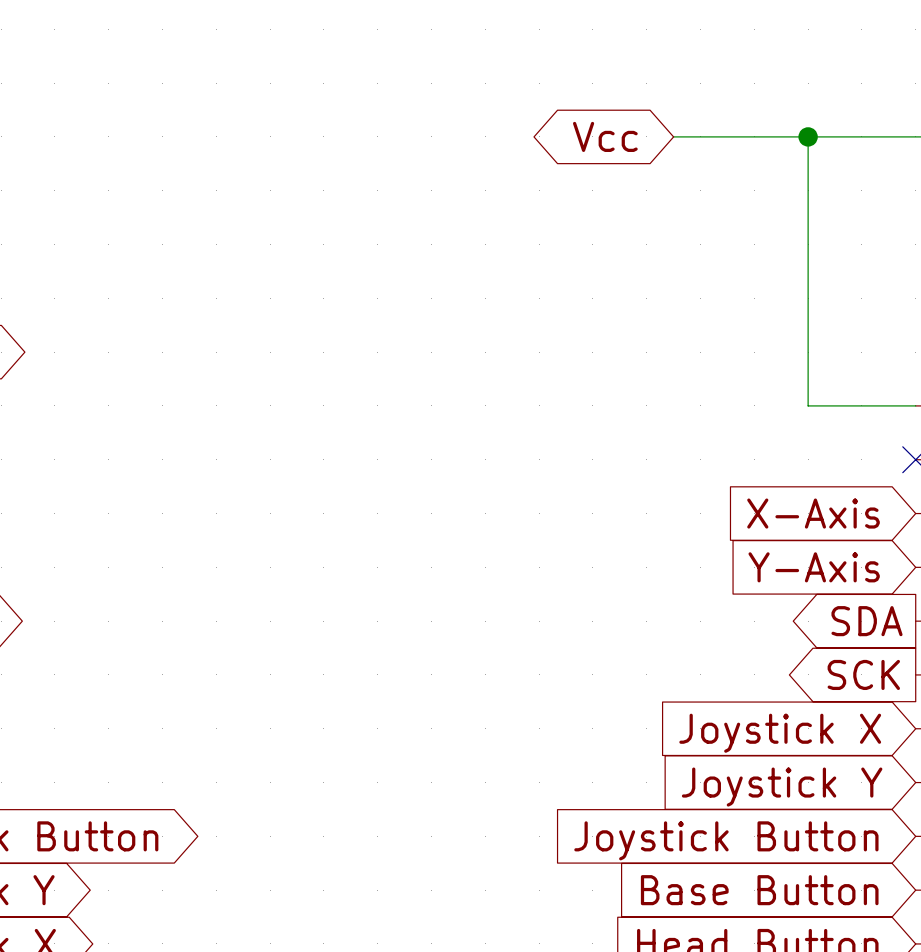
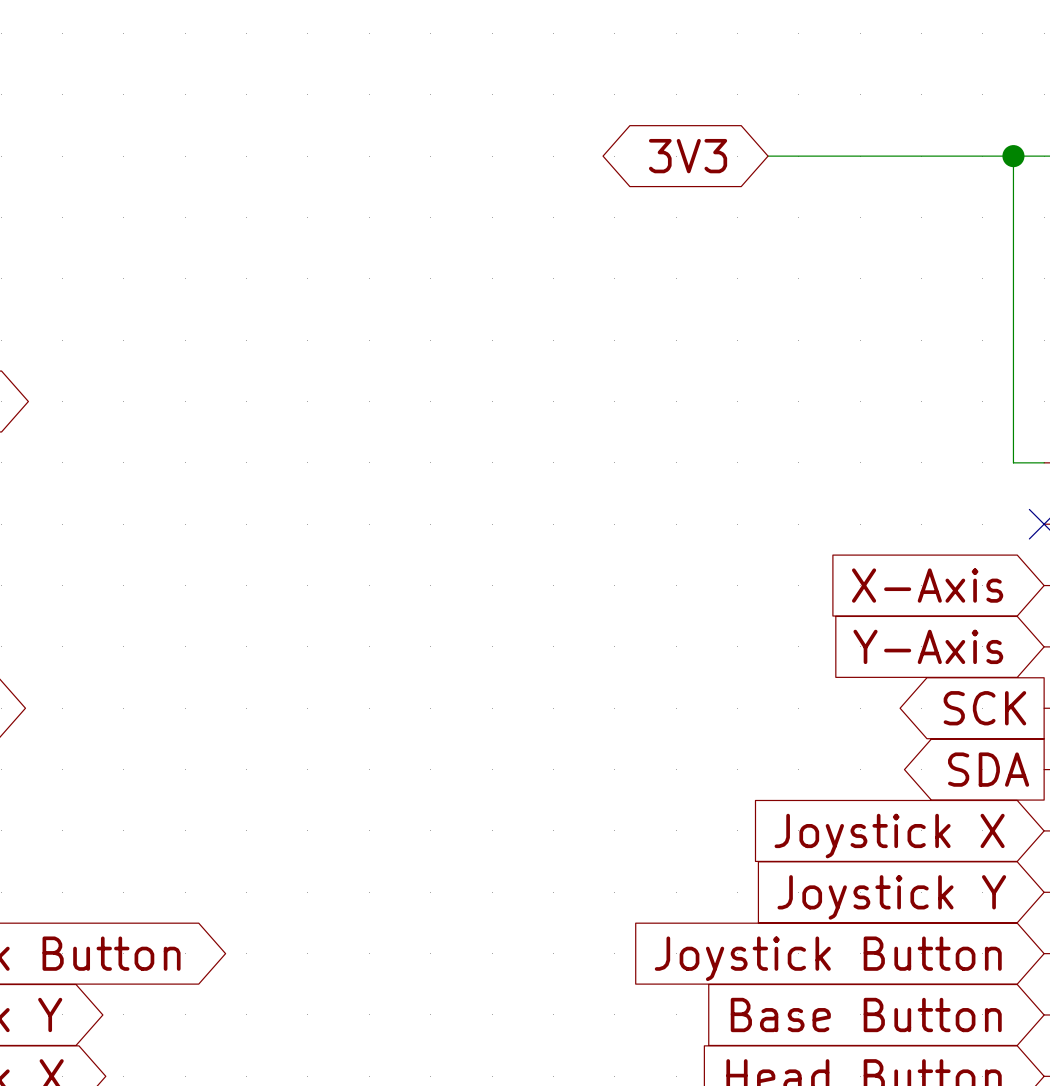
global label: Vcc (605, 136) -> 3V3 (688, 156)
wire: (808, 136) (808, 405) (888, 405) -> (1013, 156) (1013, 462)
junction position: (808, 136) -> (1013, 156)
global label: SDA (867, 621) -> SCK (984, 708)
global label: SCK (863, 674) -> SDA (988, 769)

